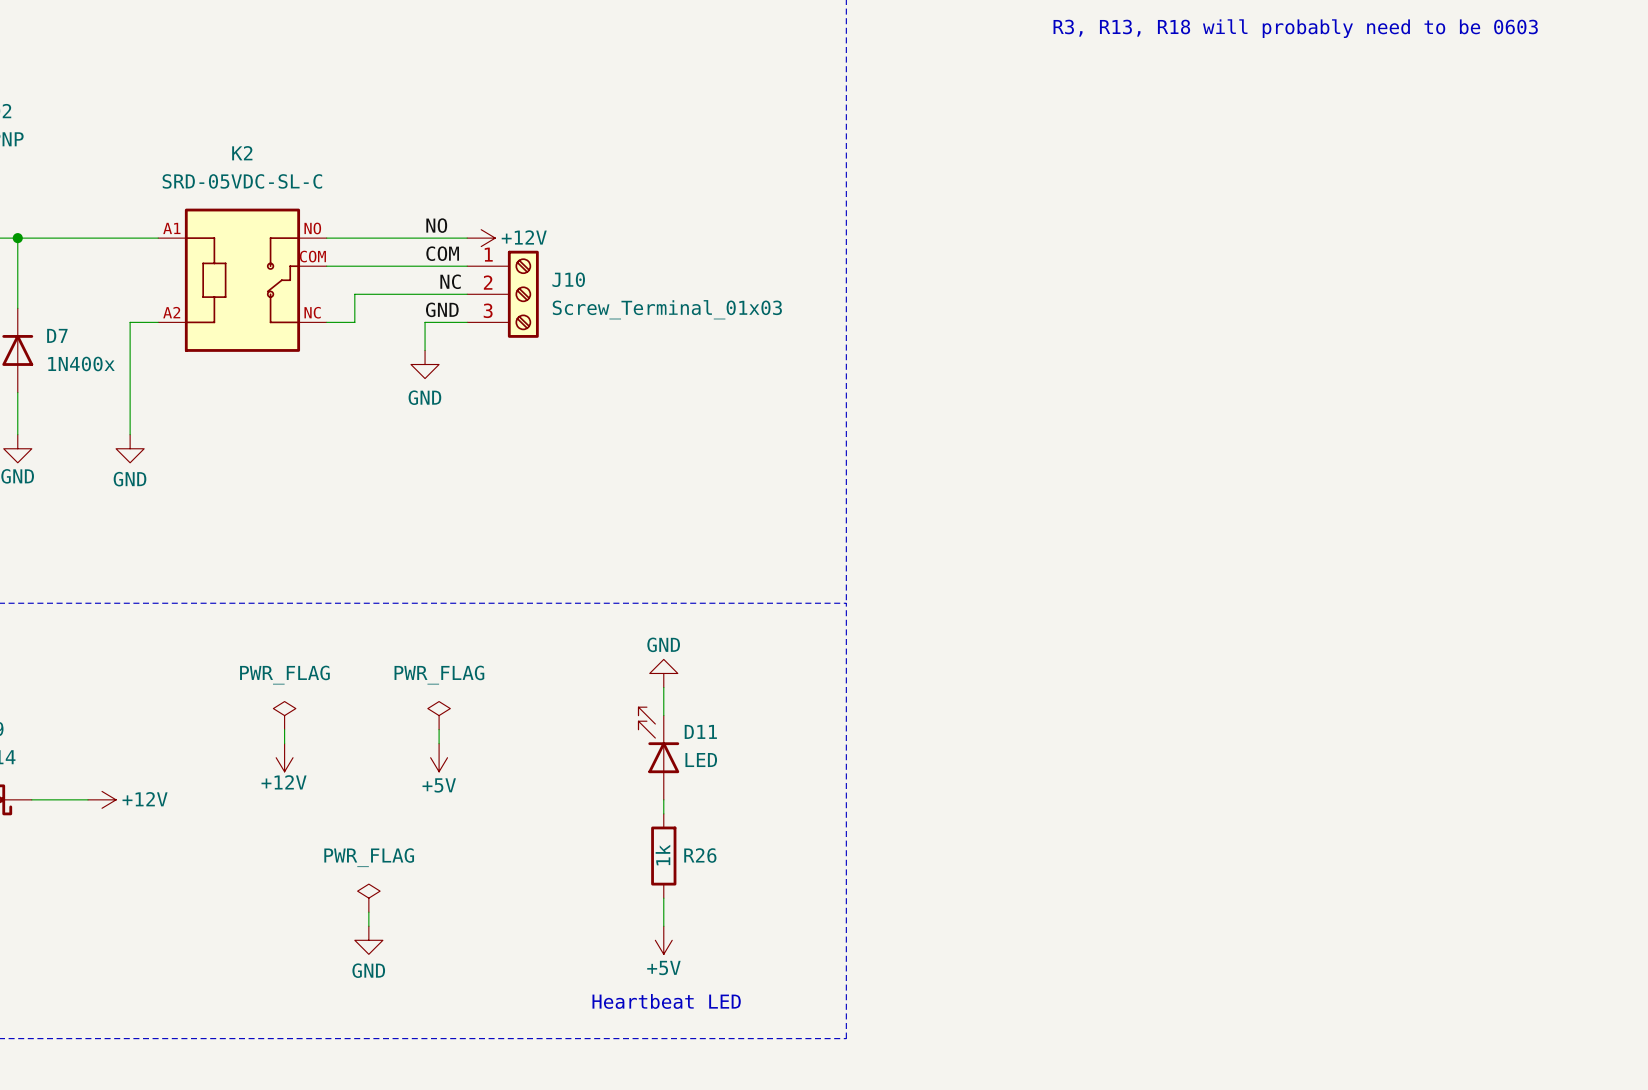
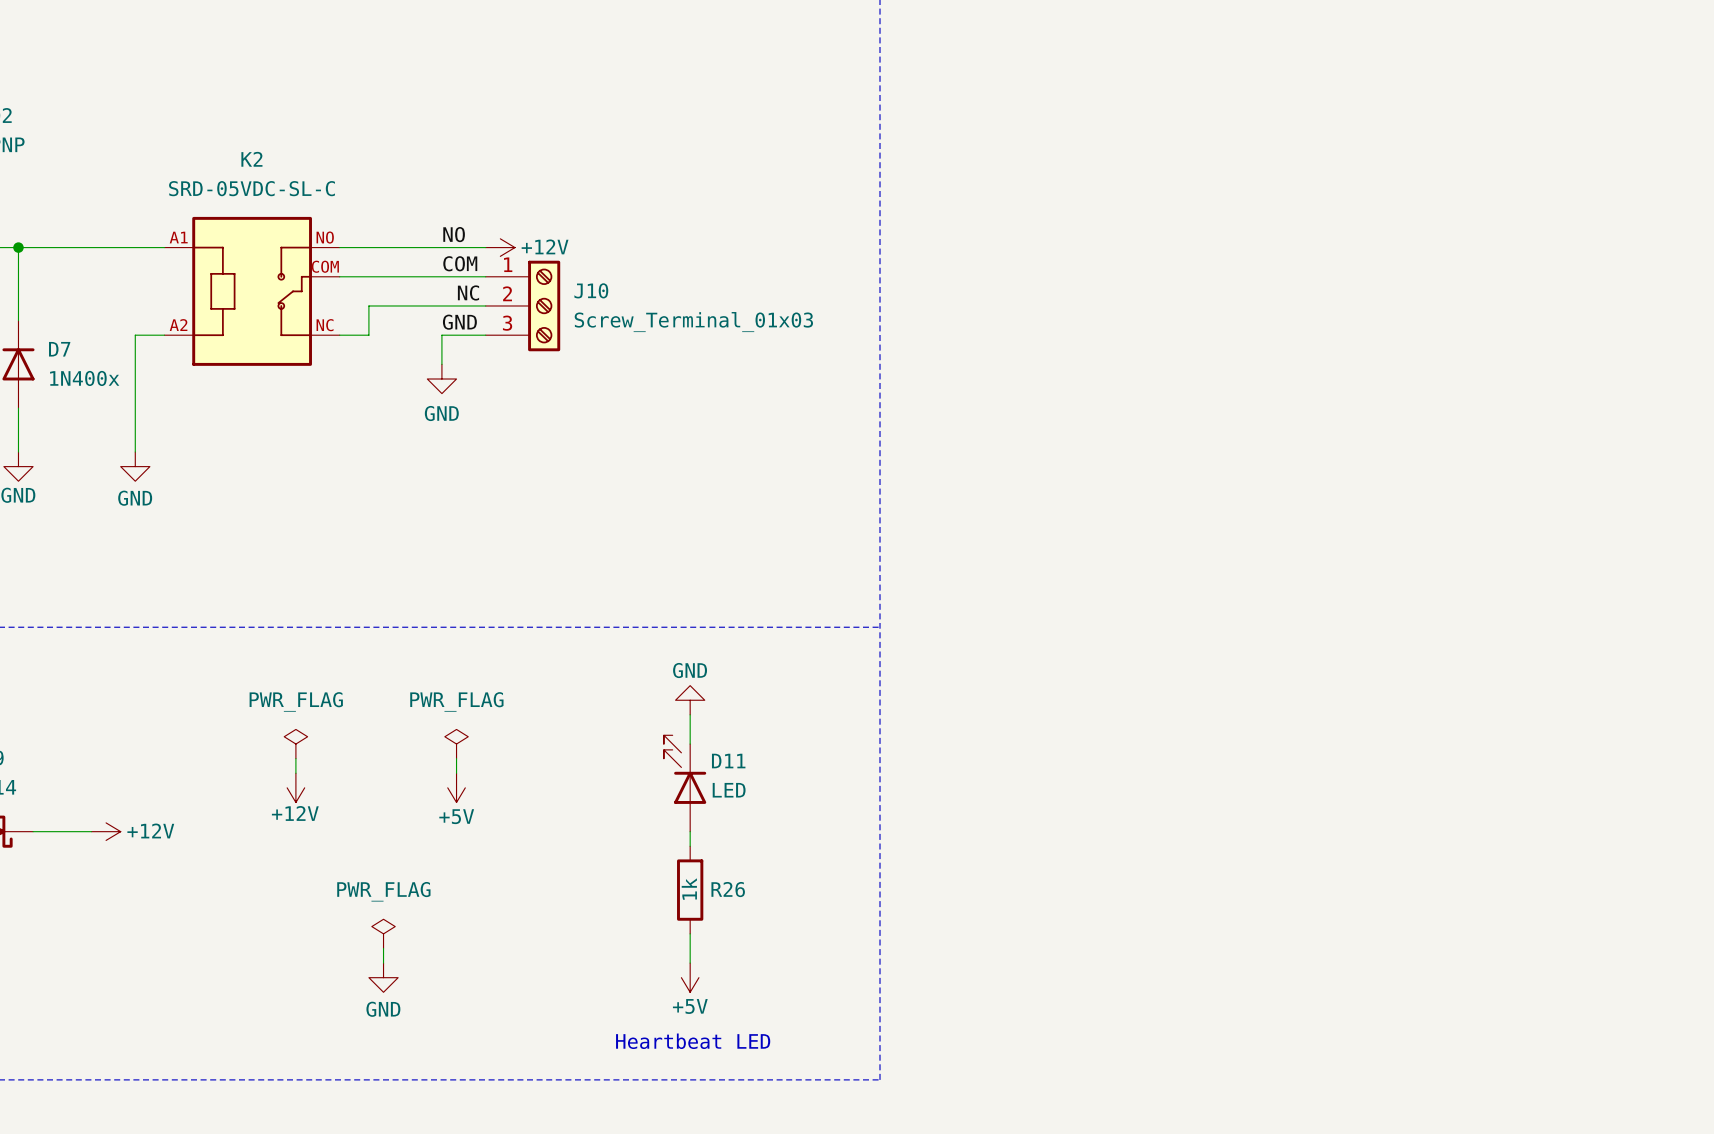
text: R3, R13, R18 will probably need to be 0603 (1295, 28) -> none

